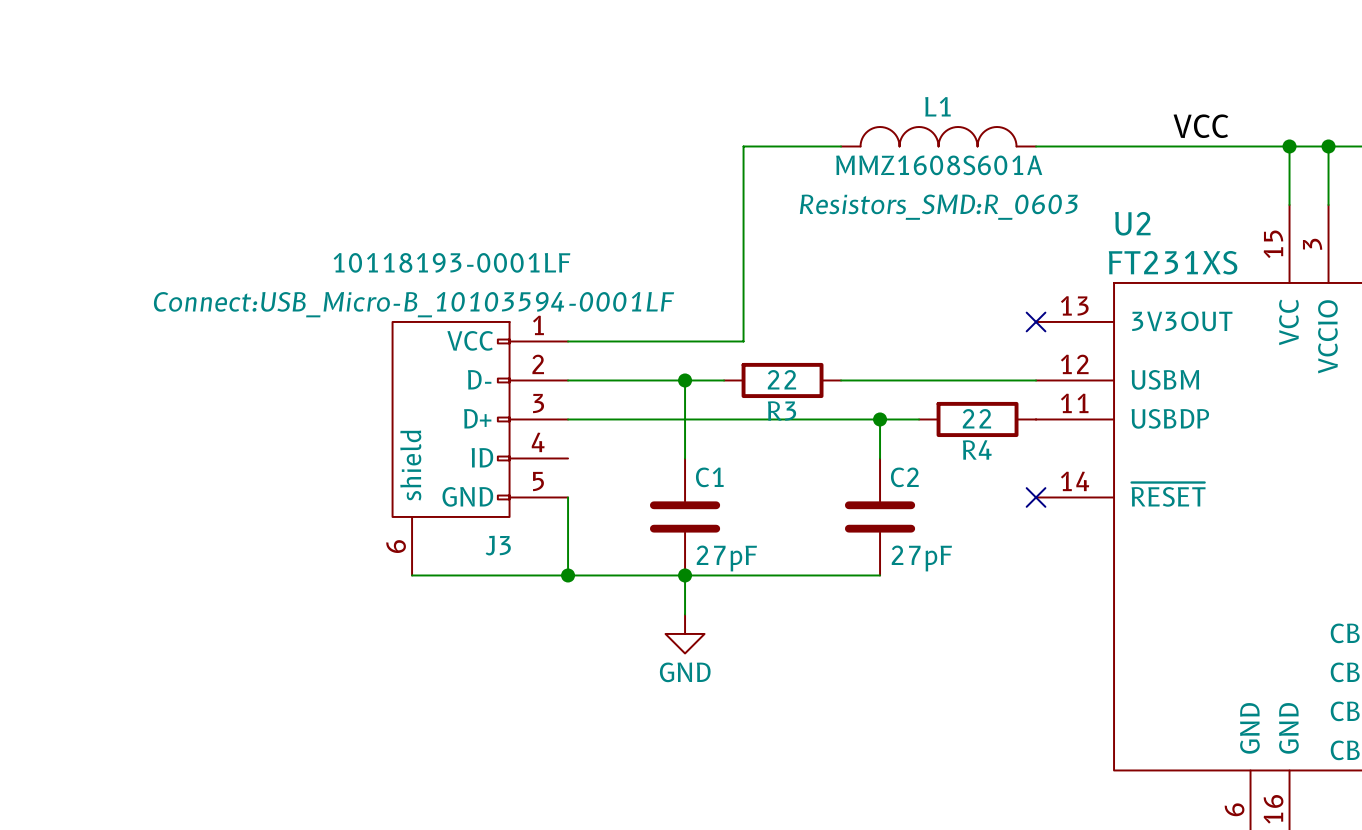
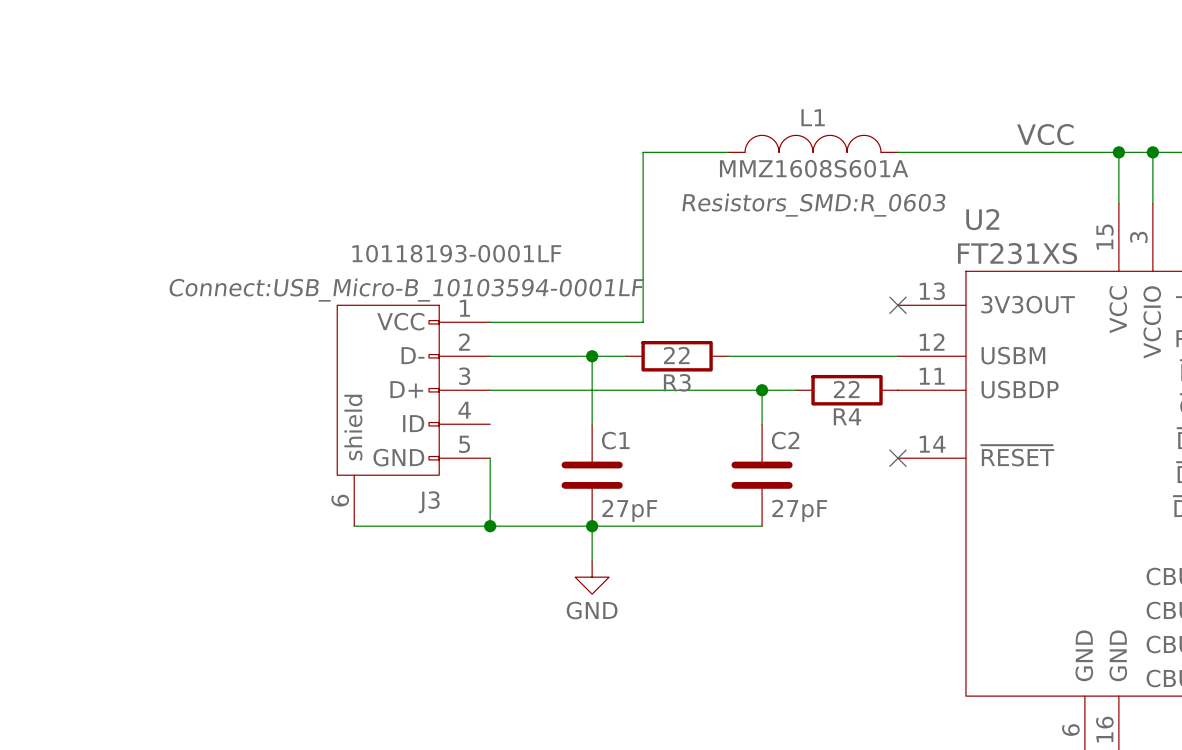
J3 value position: 10118193-0001LF (451, 262) -> 10118193-0001LF (456, 253)
J3 text position: Connect:USB_Micro-B_10103594-0001LF (413, 304) -> Connect:USB_Micro-B_10103594-0001LF (406, 290)

